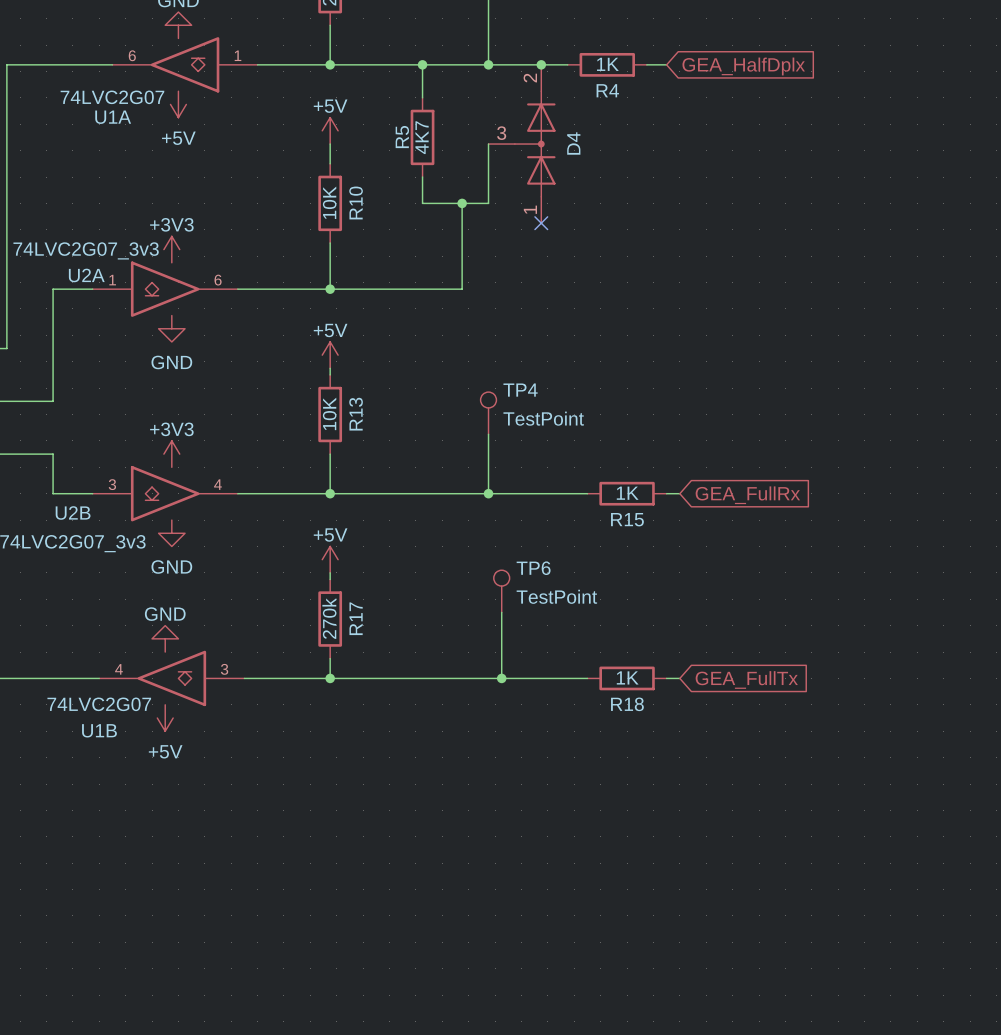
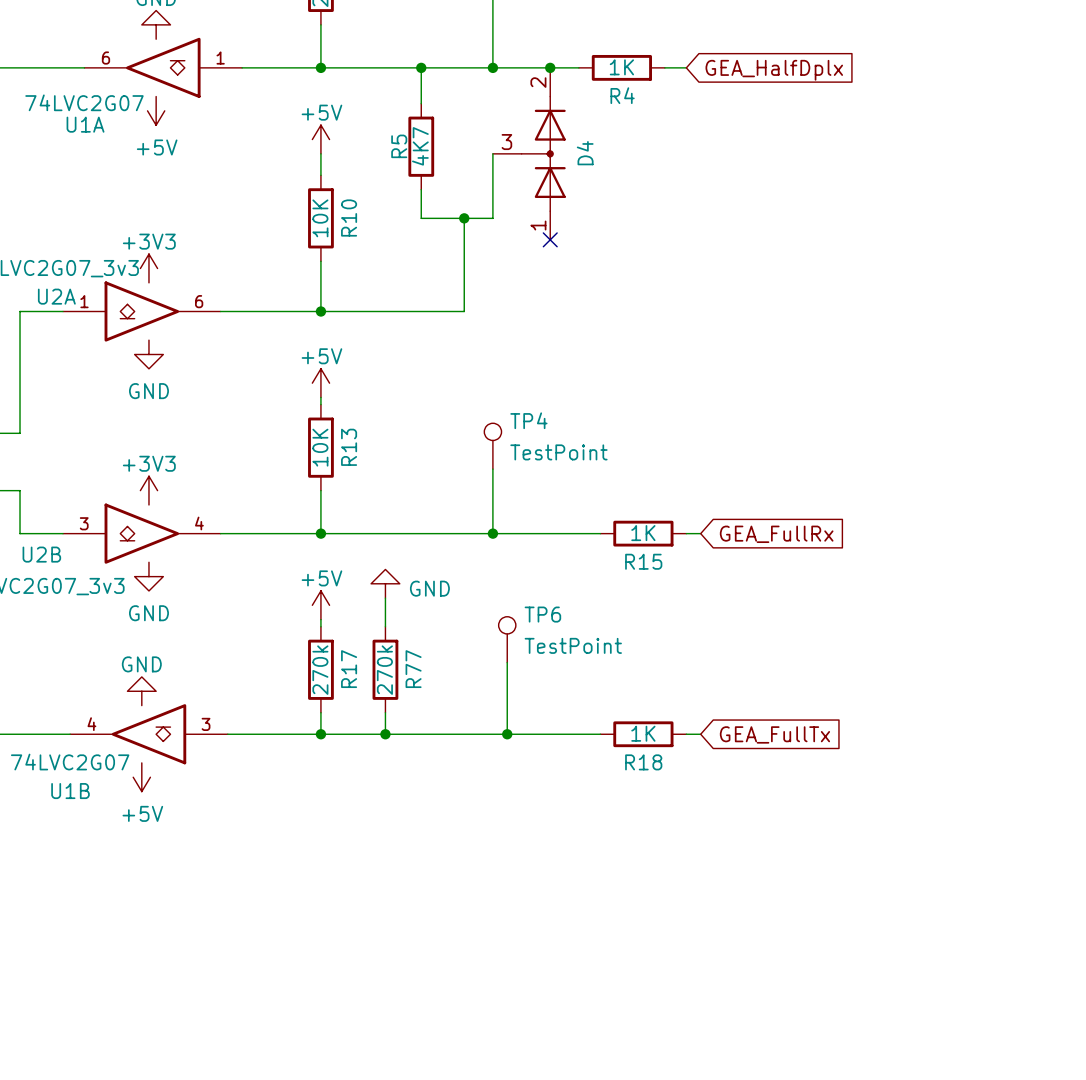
power symbol: none -> GND (385, 583)
wire: none -> (385, 598) (385, 626)
R77: none -> 270k (385, 669)
wire: none -> (385, 712) (385, 734)
junction: none -> (385, 734)

